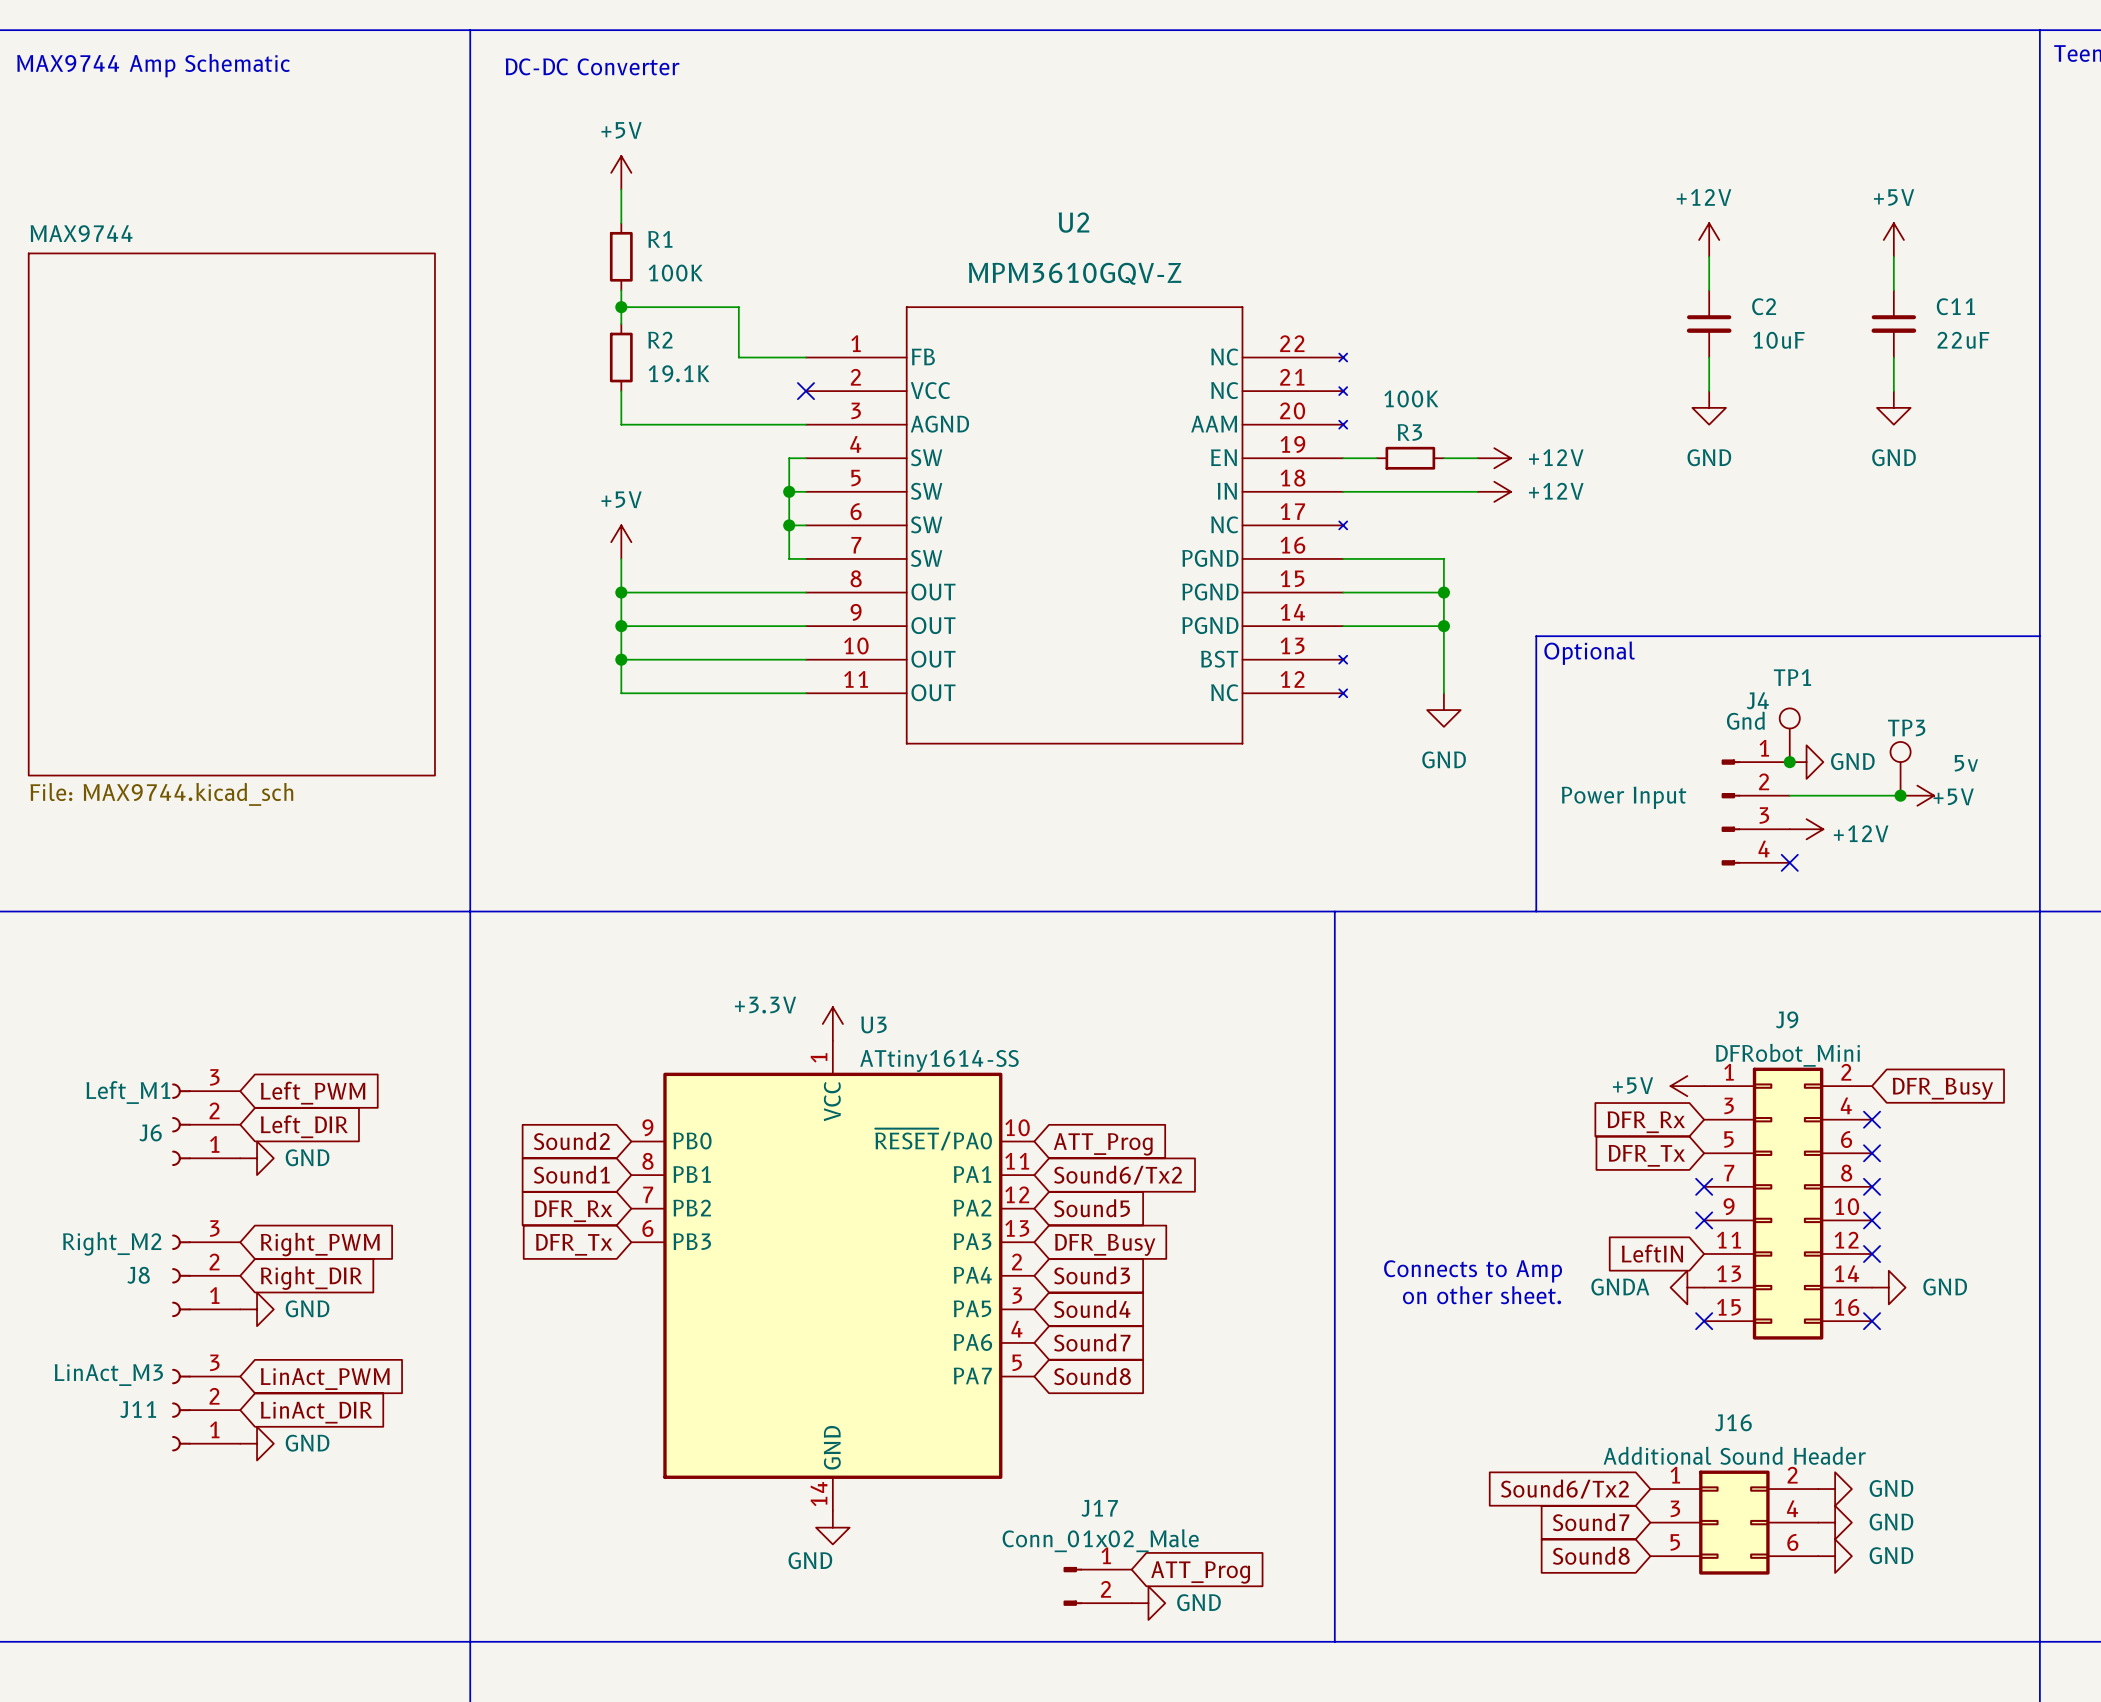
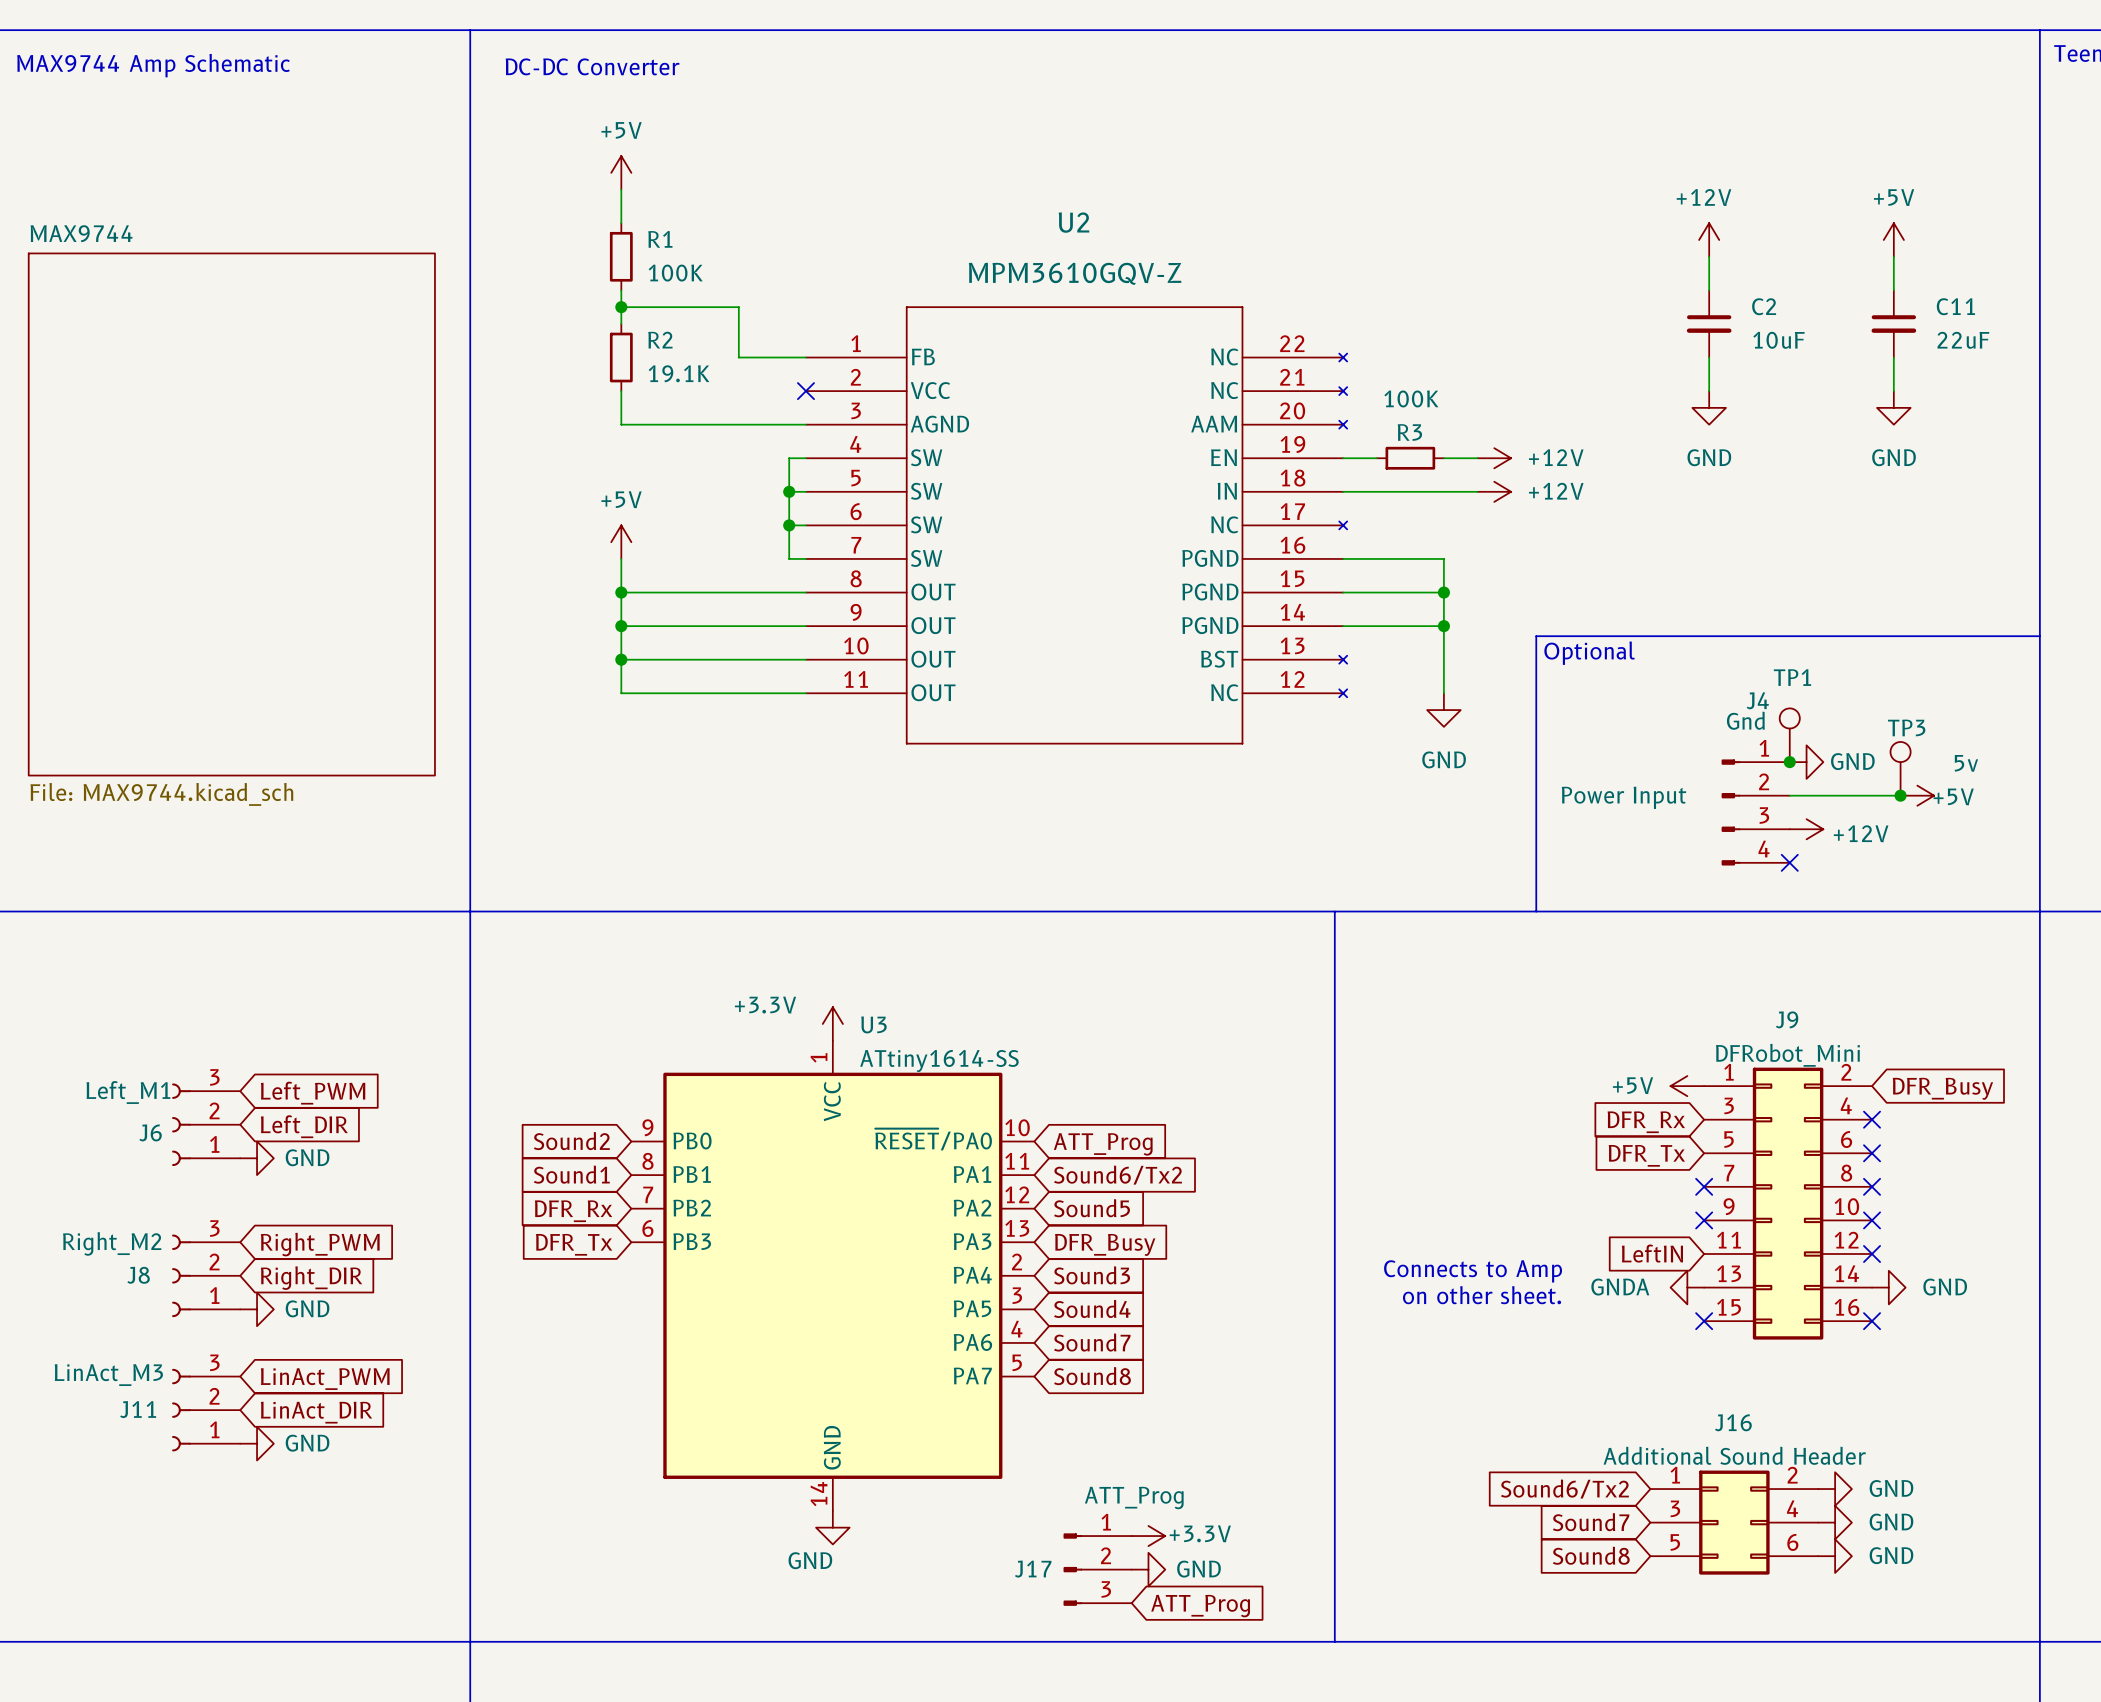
J17 name position: J17 (1099, 1508) -> J17 (1033, 1569)
power symbol: none -> +3.3V (1148, 1536)
J17 value: Conn_01x02_Male (1100, 1540) -> ATT_Prog (1134, 1497)
J17 symbol: [1063, 1566, 1132, 1606] -> [1063, 1533, 1132, 1606]
global label position: ATT_Prog (1200, 1572) -> ATT_Prog (1200, 1606)
power symbol position: GND (1148, 1603) -> GND (1148, 1569)

